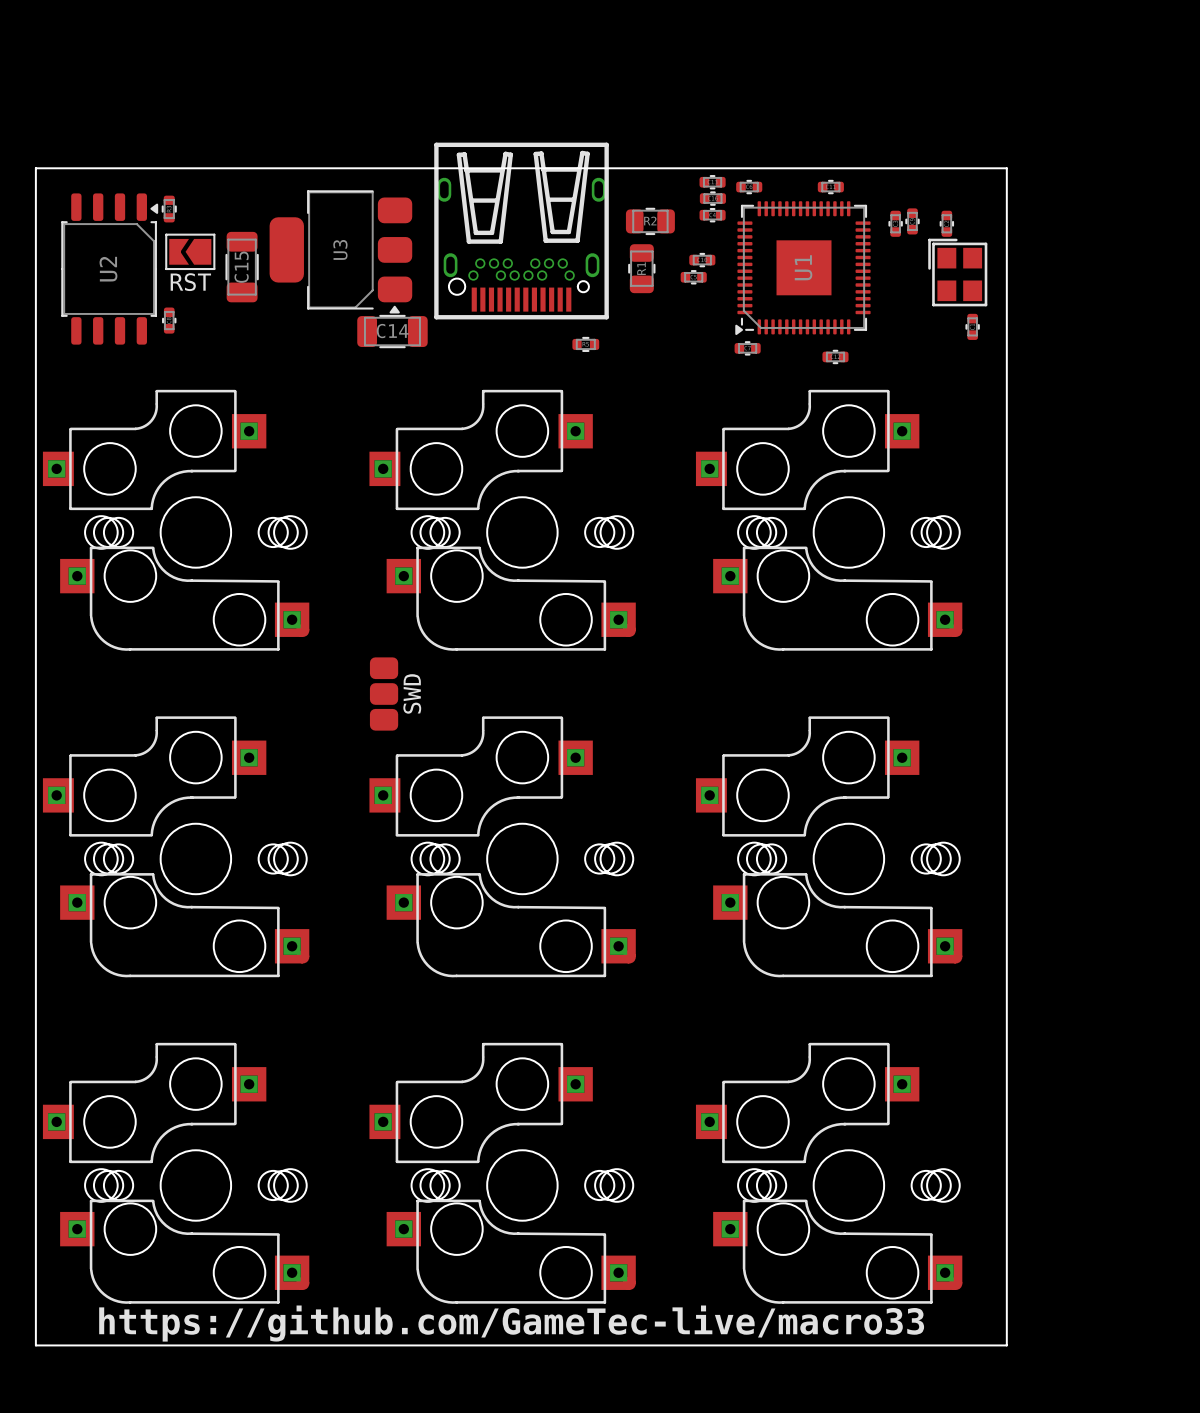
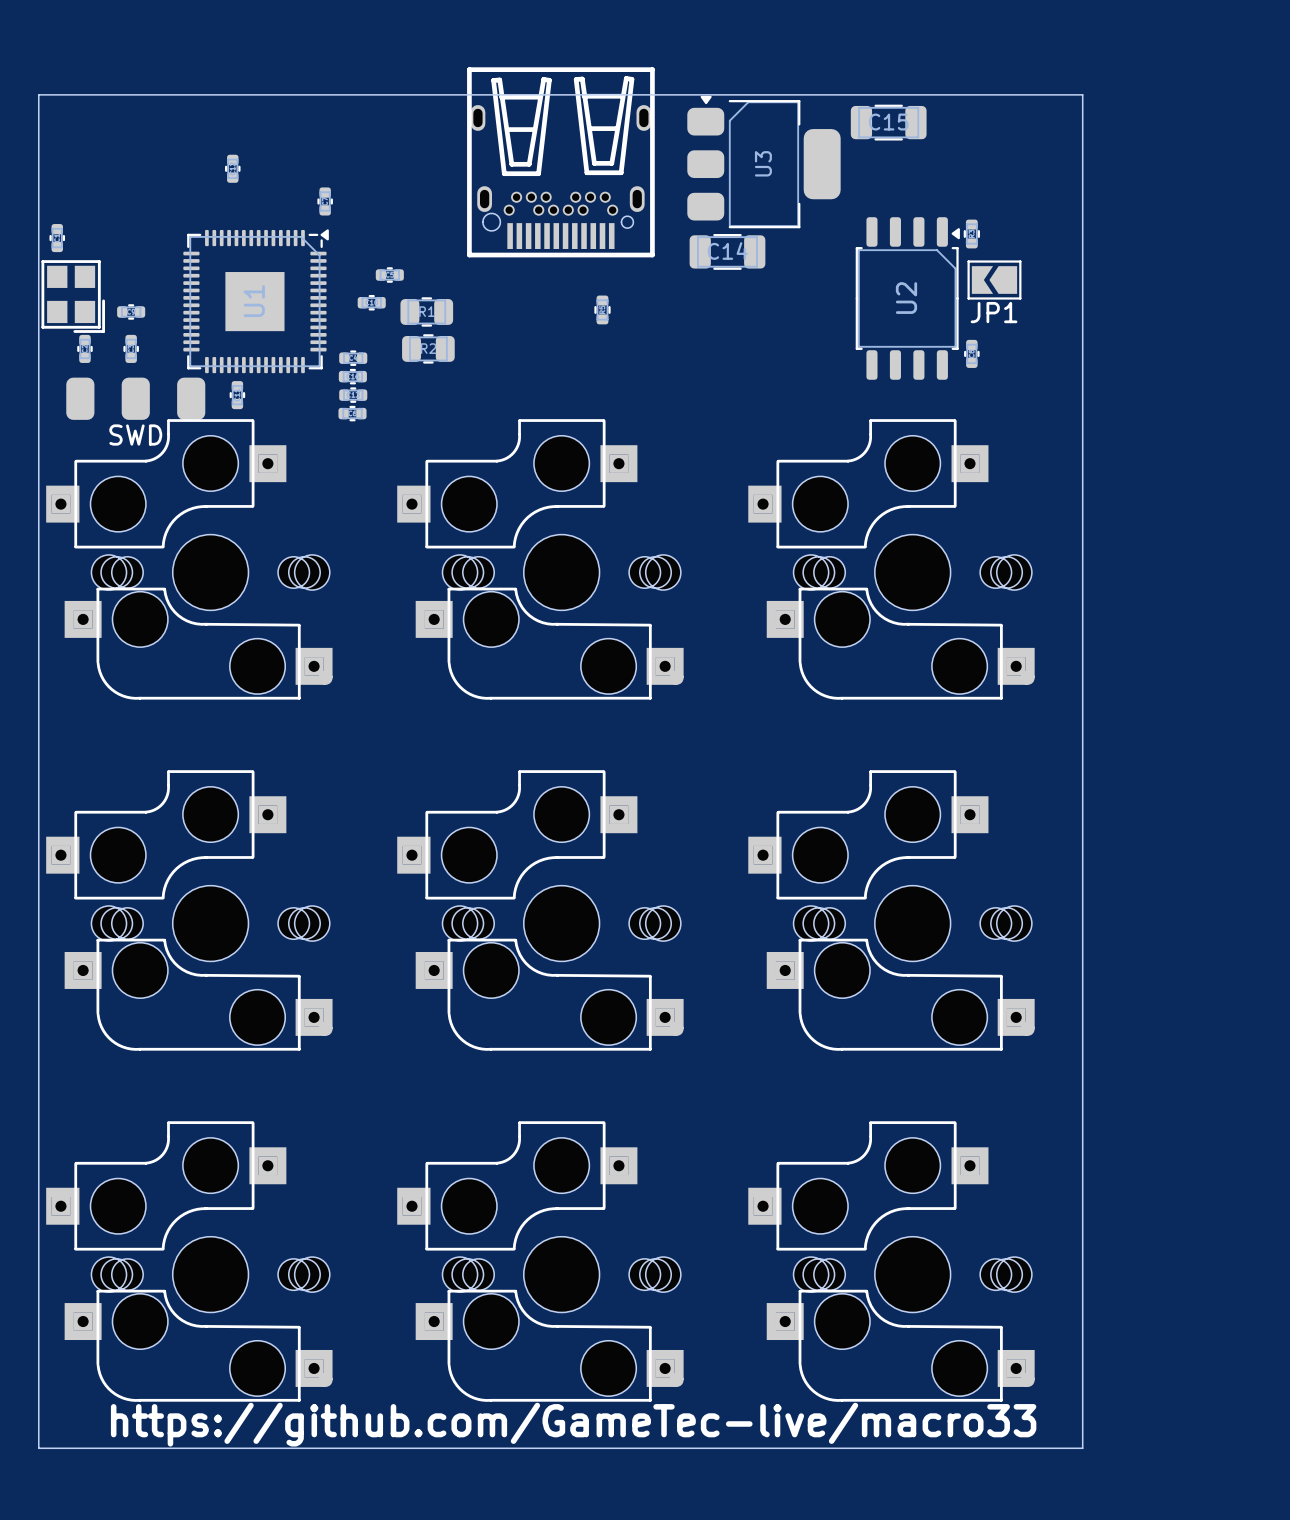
board edge: (35, 168) (1006, 168) (1006, 1345) (35, 1345) (35, 168) -> (38, 94) (38, 1448) (1082, 1448) (1082, 94) (38, 94)
part position: (712, 182) -> (353, 395)
part position: (749, 187) -> (352, 413)
part rotation: 0° (830, 187) -> 90° clockwise (237, 395)
part position: (830, 187) -> (237, 395)
part position: (712, 198) -> (352, 376)
part position: (169, 209) -> (971, 234)
part position: (712, 215) -> (353, 358)
R2 position: (650, 221) -> (428, 348)
part rotation: 0° (912, 221) -> 90° clockwise (131, 311)
part position: (912, 221) -> (131, 311)
part position: (895, 223) -> (131, 348)
part position: (946, 223) -> (84, 348)
part position: (521, 231) -> (560, 162)
RST: (190, 251) -> none
U3 rotation: 0° (340, 251) -> 180° (763, 162)
U3 position: (340, 251) -> (763, 162)
part position: (702, 260) -> (371, 302)
JP1: none -> (994, 280)
C15 rotation: 0° (242, 267) -> 90° clockwise (888, 122)
C15 position: (242, 267) -> (888, 122)
R1 rotation: 0° (641, 268) -> 90° clockwise (426, 311)
R1 position: (641, 268) -> (426, 311)
U1 rotation: 0° (802, 268) -> 180° (256, 301)
U1 position: (802, 268) -> (256, 301)
U2 position: (109, 269) -> (907, 298)
part: (957, 272) -> none
part: none -> (73, 296)
part position: (693, 277) -> (389, 275)
part position: (169, 320) -> (971, 353)
part position: (972, 326) -> (57, 238)
C14 position: (392, 331) -> (727, 251)
part rotation: 0° (585, 344) -> 90° clockwise (602, 309)
part position: (585, 344) -> (602, 309)
part rotation: 0° (747, 348) -> 90° clockwise (325, 201)
part position: (747, 348) -> (325, 201)
part rotation: 0° (835, 356) -> 90° clockwise (232, 168)
part position: (835, 356) -> (232, 168)
SWD: none -> (135, 398)
SWD: (384, 694) -> none

